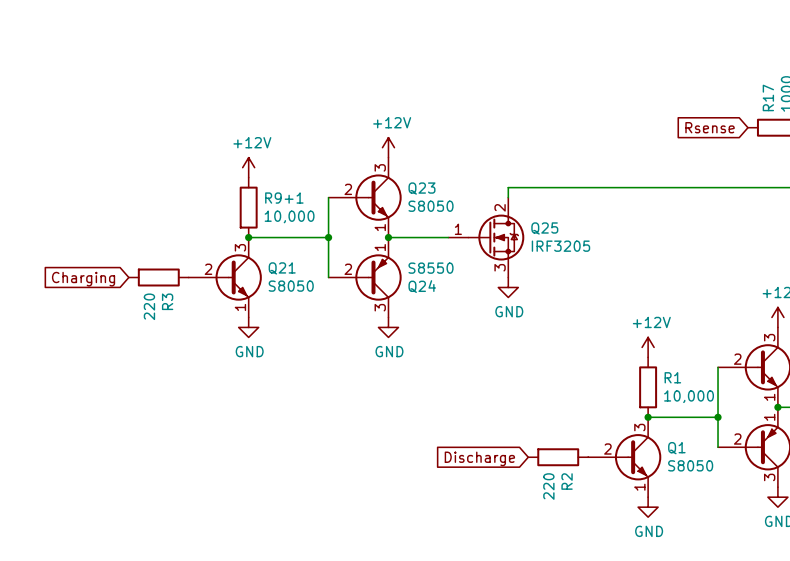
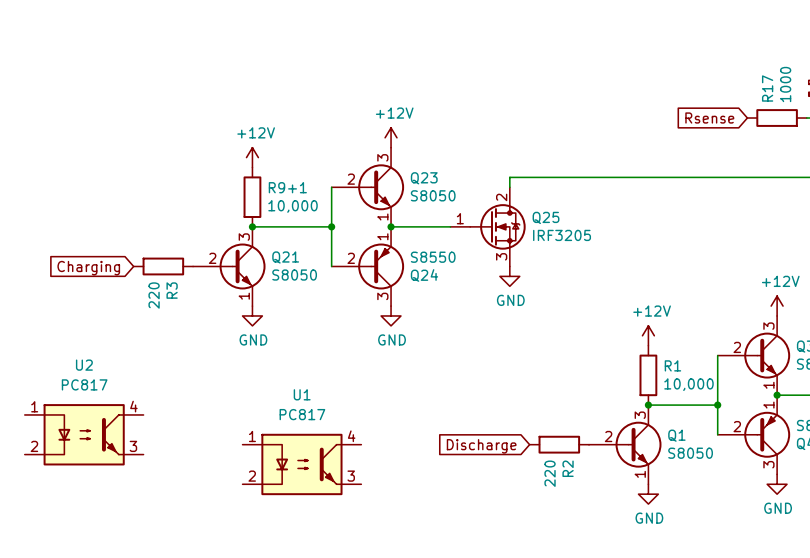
U2: none -> PC817 (84, 434)
U1: none -> PC817 (301, 464)

